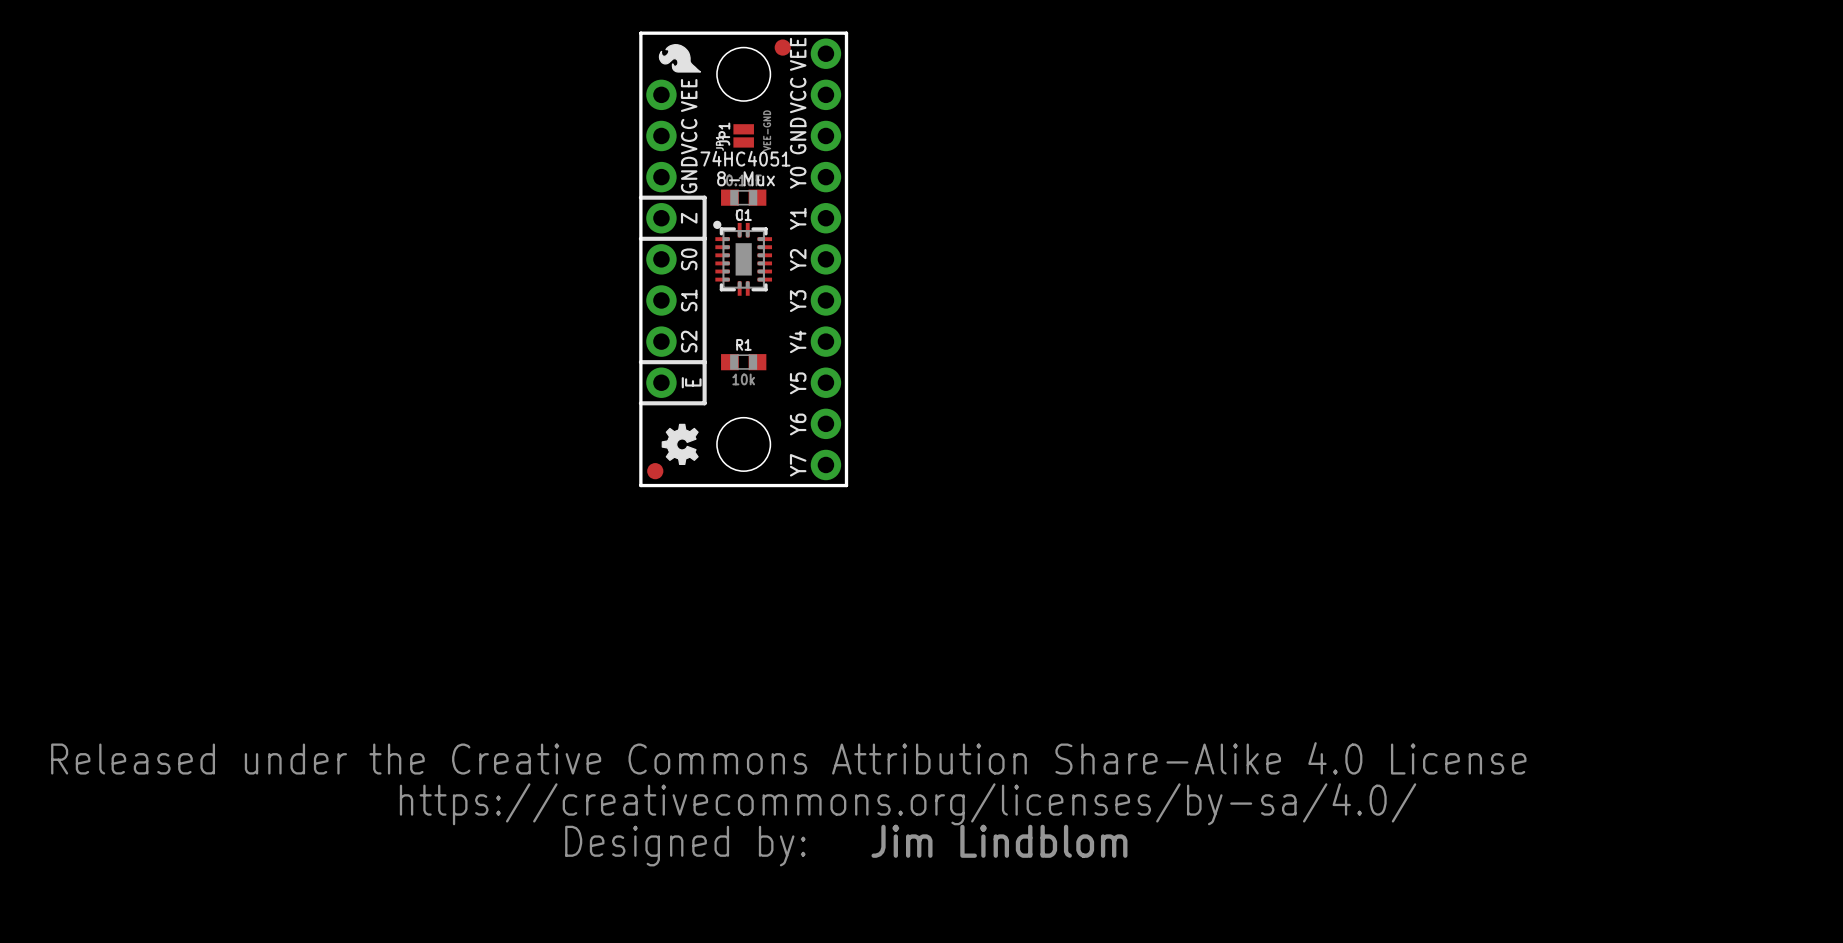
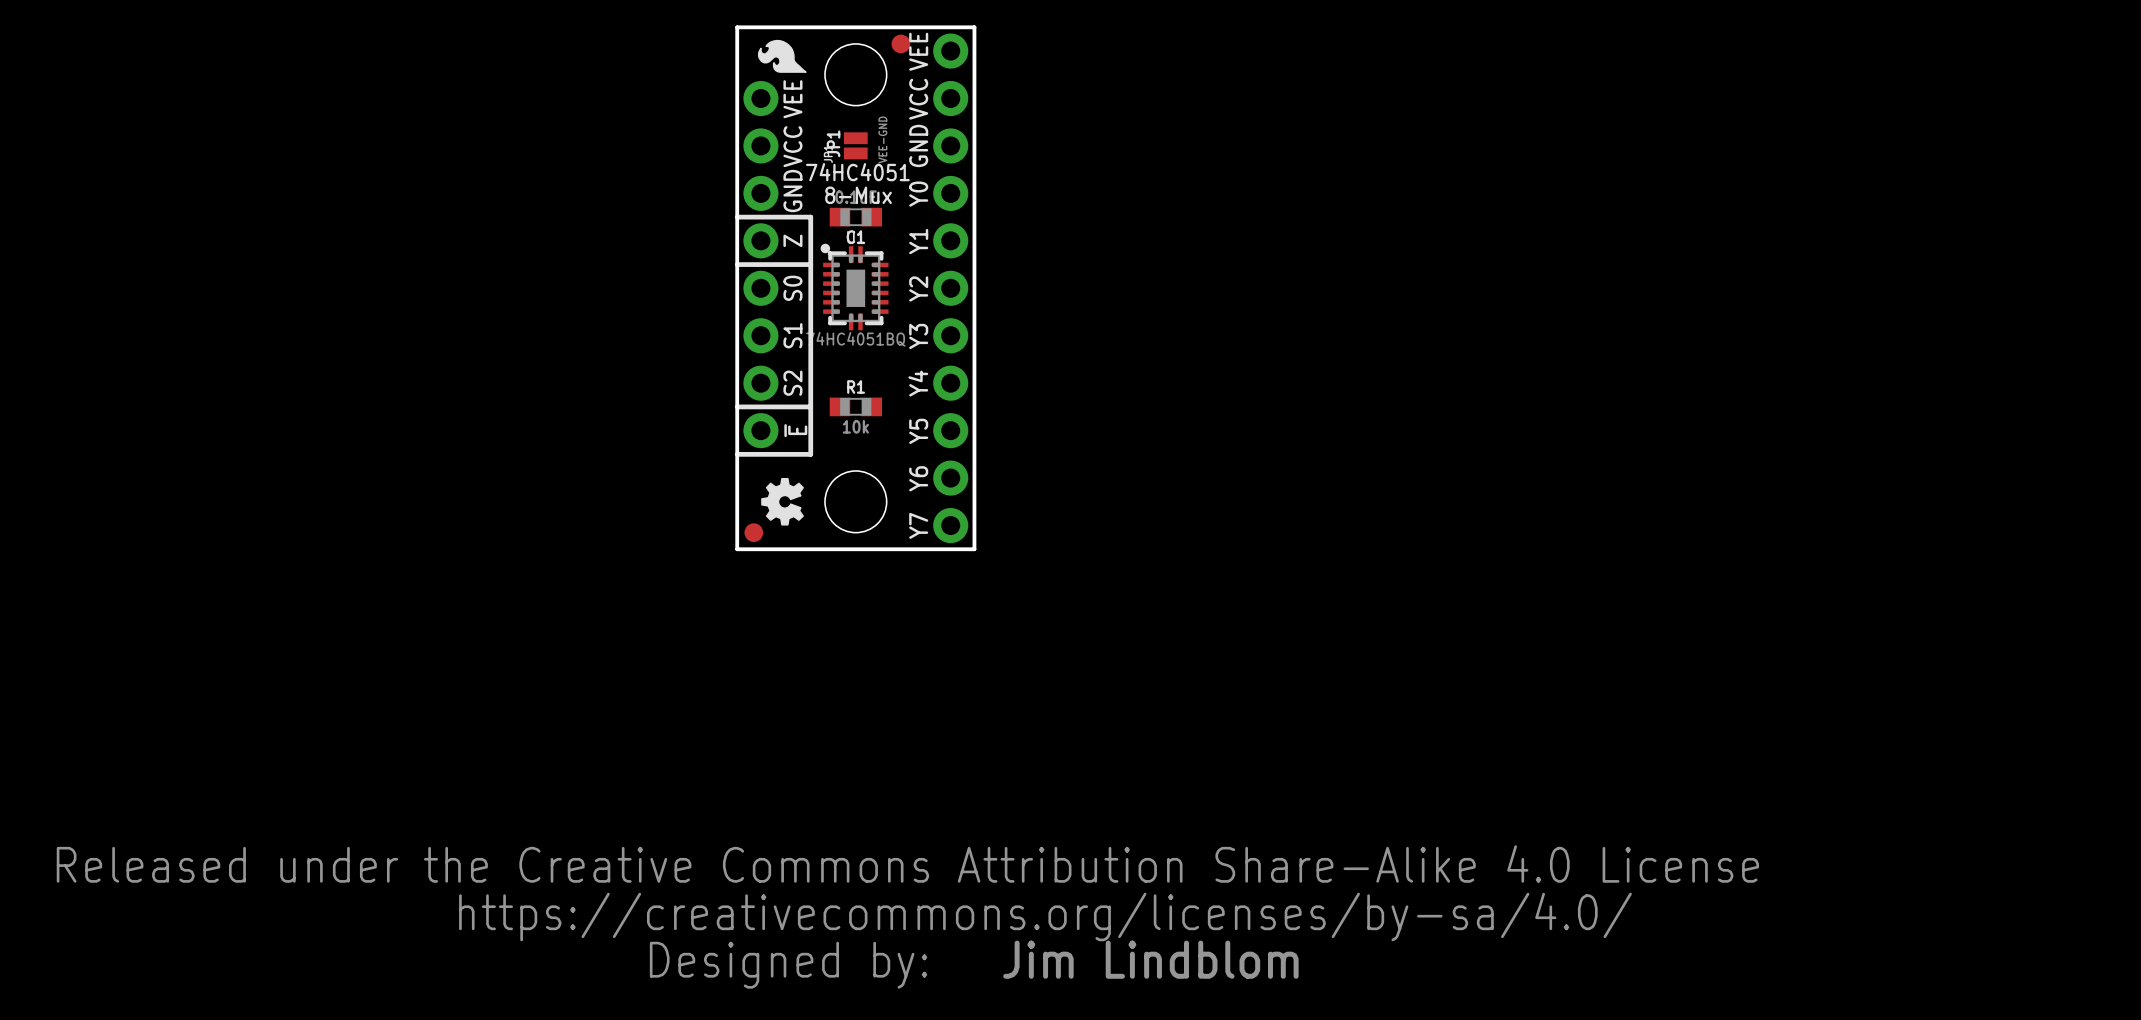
part value: none -> 74HC4051BQ (855, 339)

